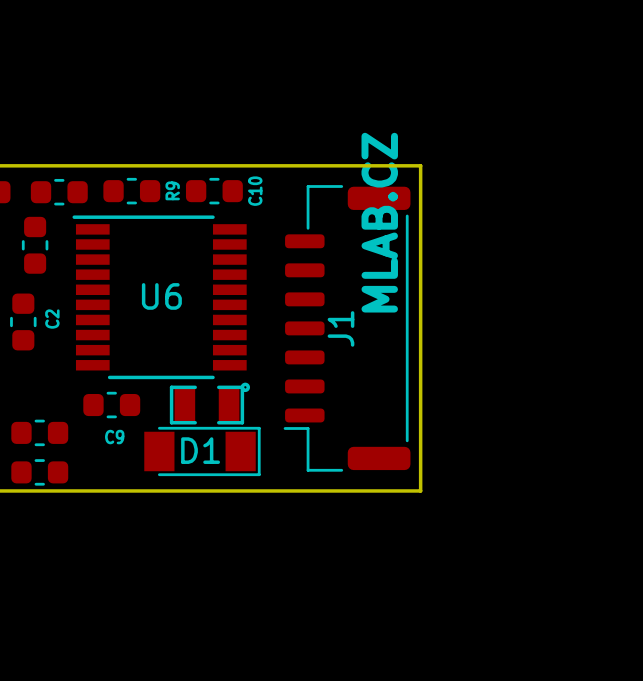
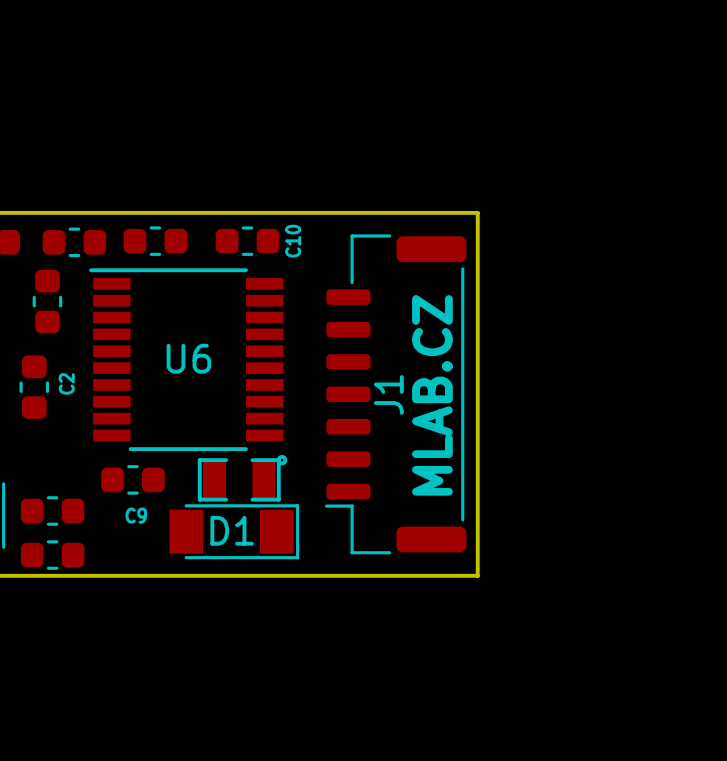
R9 name: R9 (172, 190) -> none
text position: MLAB.CZ (379, 222) -> MLAB.CZ (432, 395)

